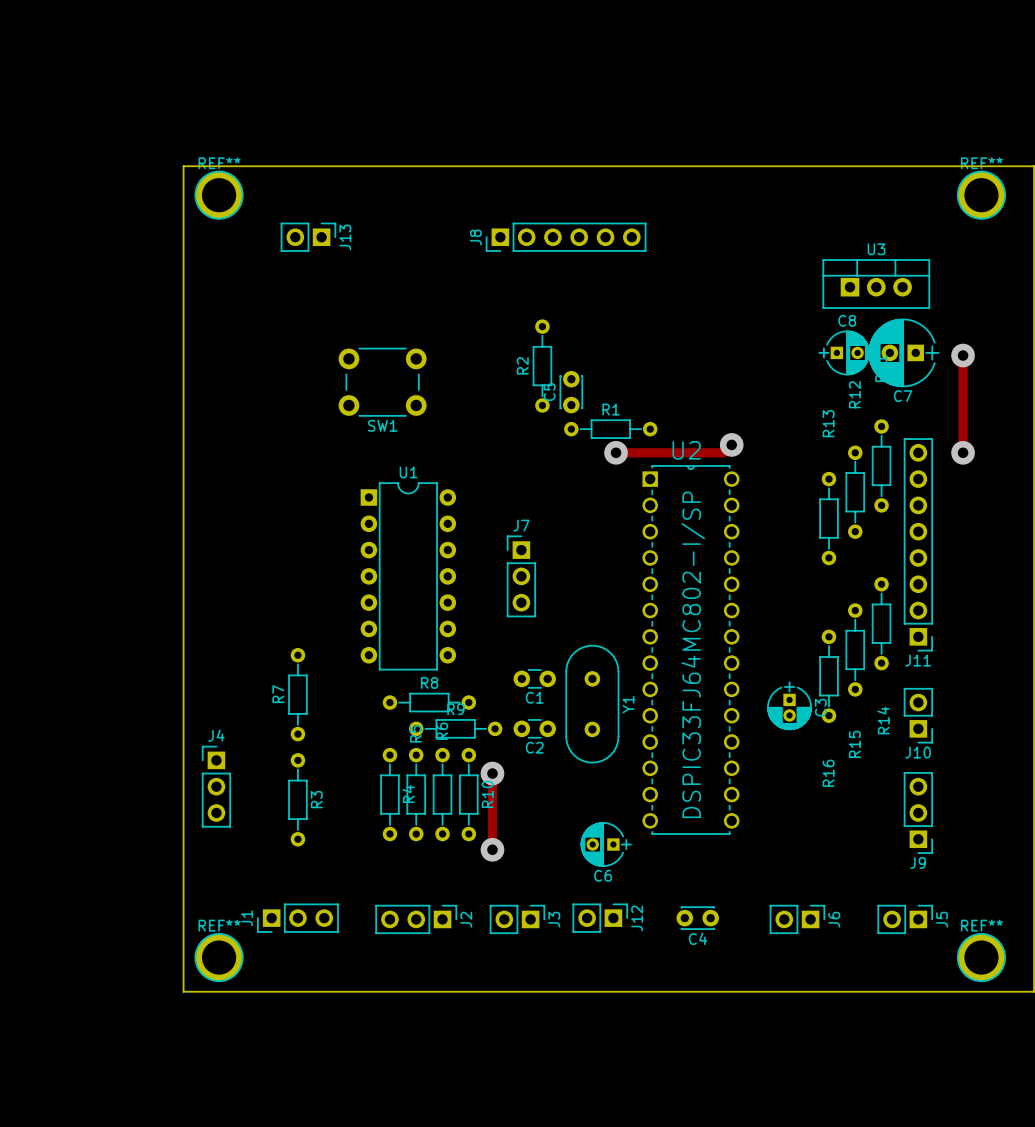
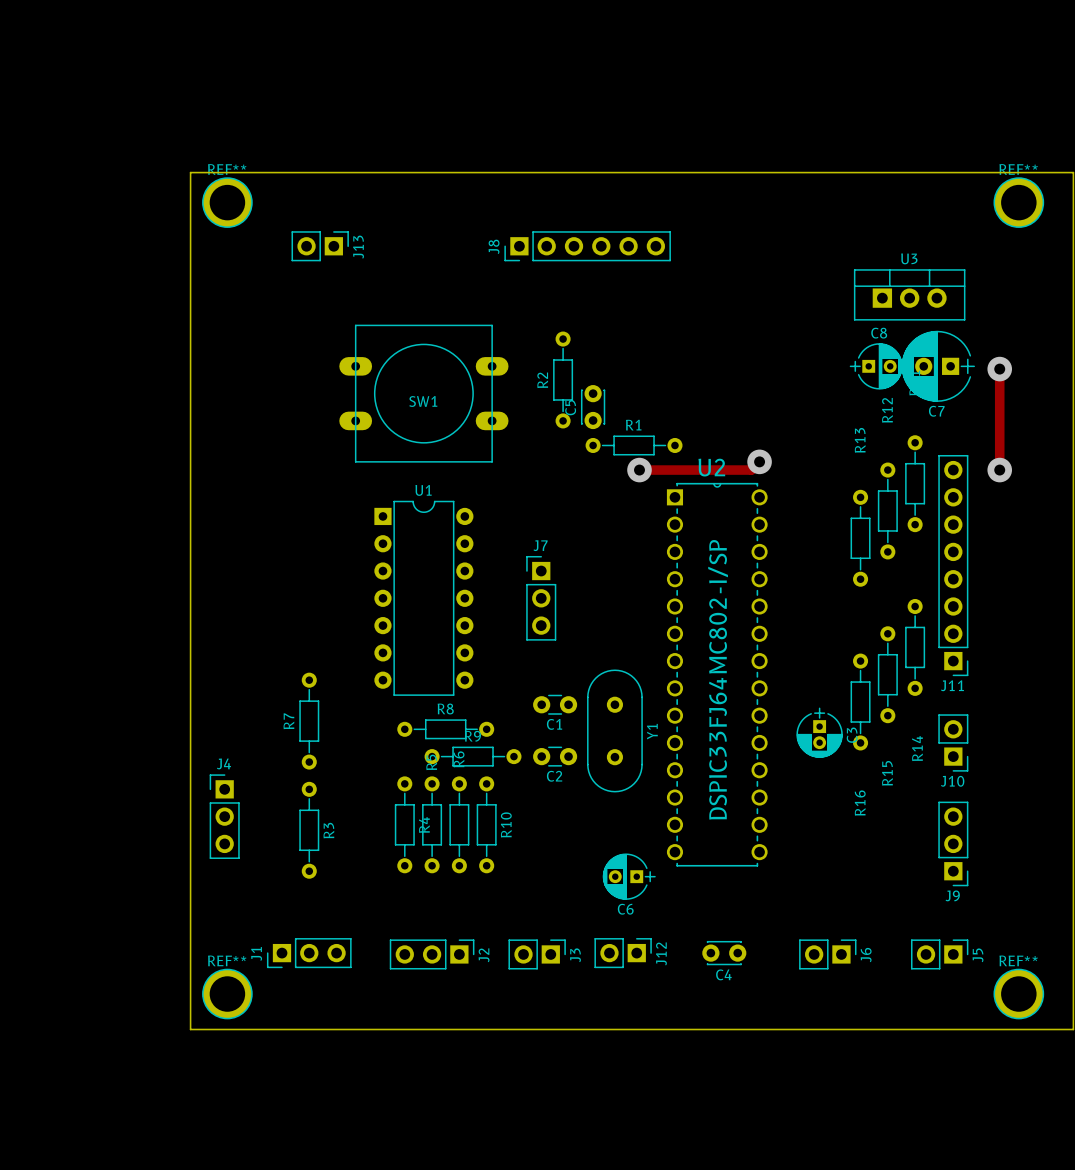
SW1 footprint: [338, 347, 427, 417] -> [339, 324, 509, 463]
SW1 name position: SW1 (382, 425) -> SW1 (423, 401)
track: (492, 773) (492, 849) -> none
via: (492, 773) -> none
via: (492, 849) -> none

